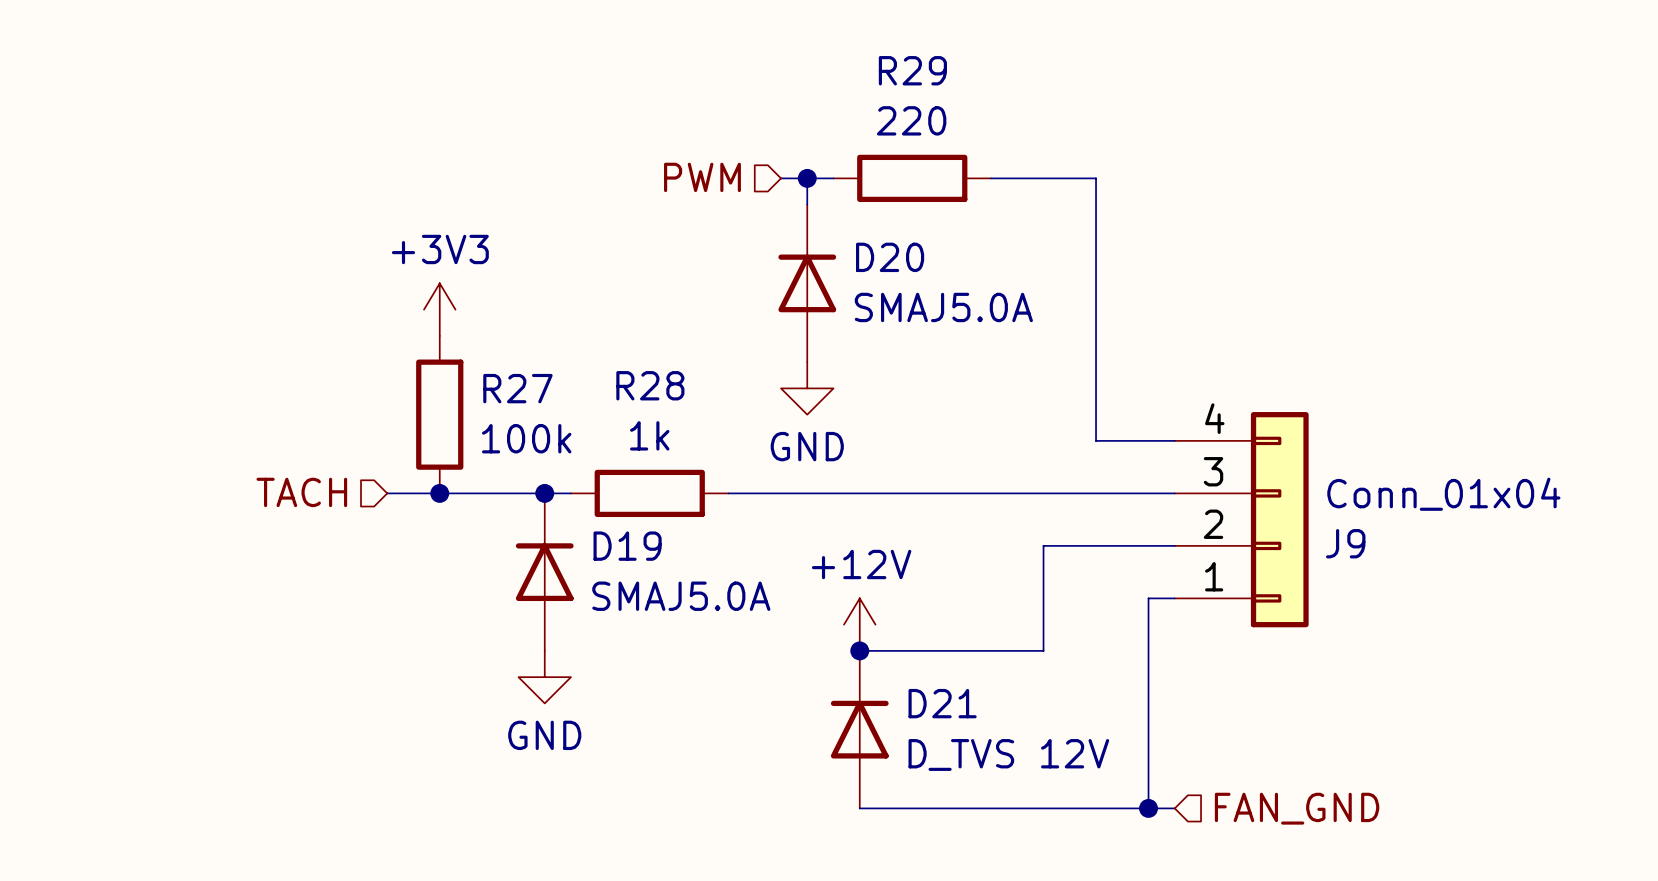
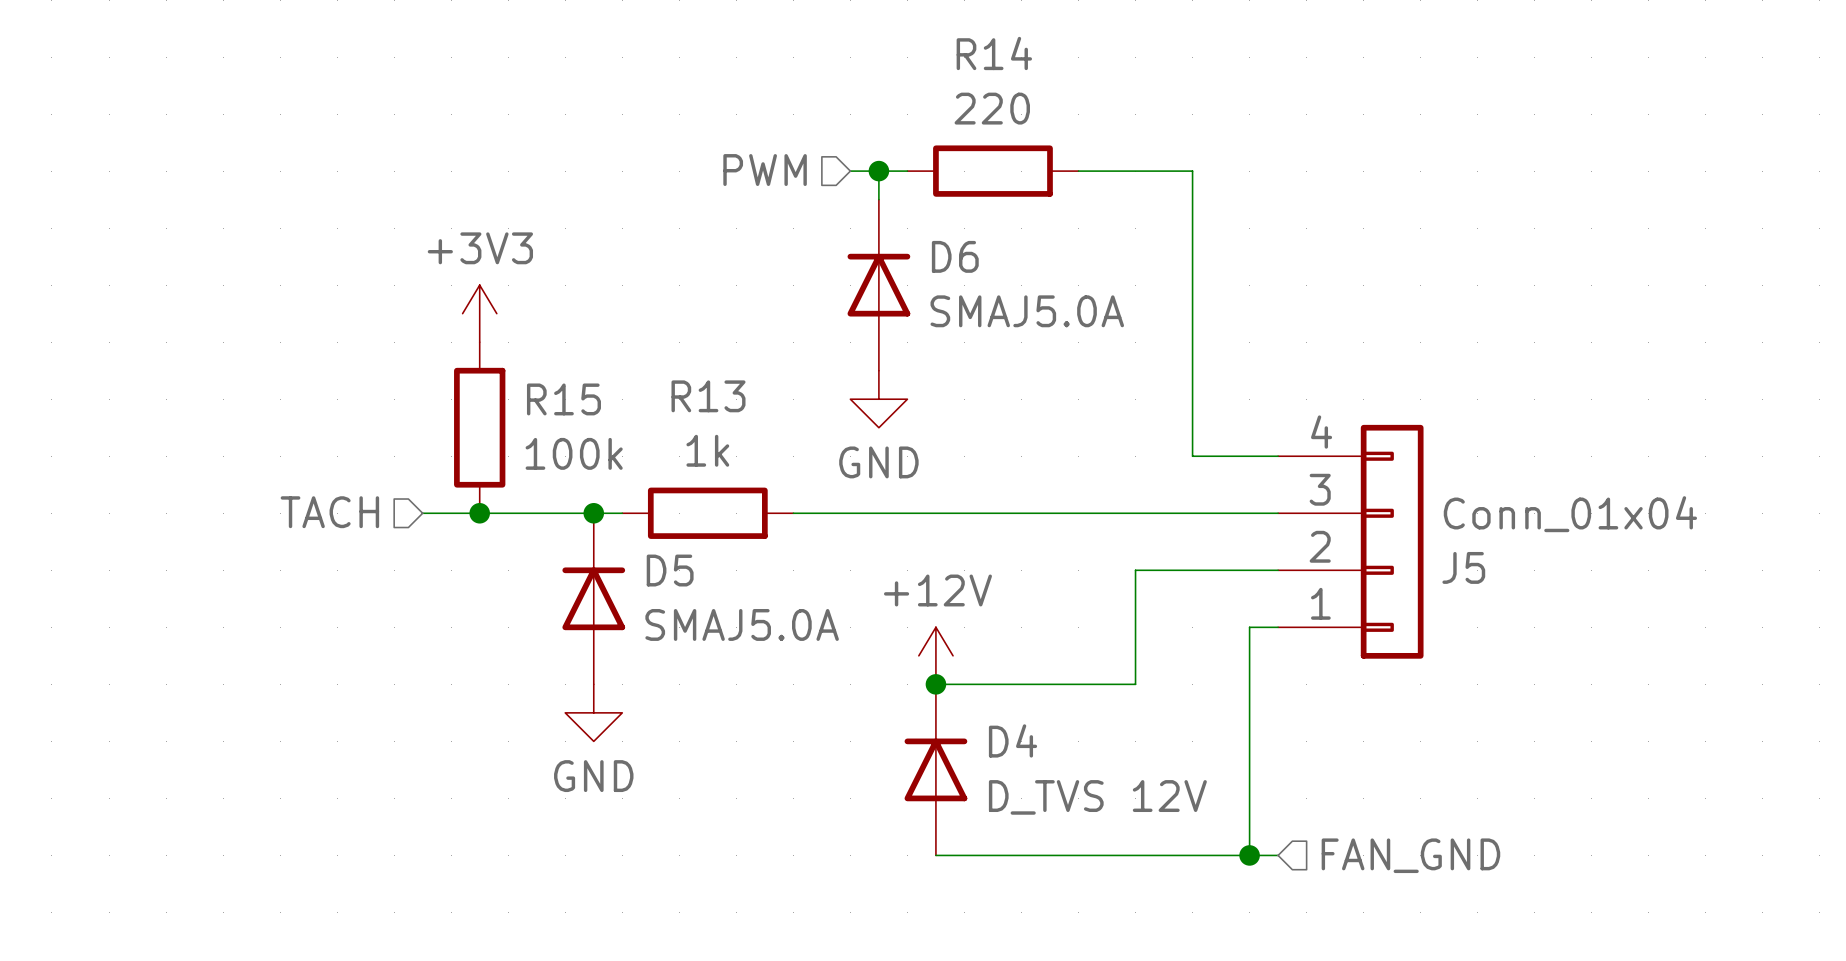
R29 name: R29 (912, 70) -> R14 (994, 53)
D20 name: D20 (890, 257) -> D6 (955, 256)
R28 name: R28 (650, 385) -> R13 (708, 396)
R27 name: R27 (517, 388) -> R15 (563, 399)
J9 name: J9 (1345, 543) -> J5 (1463, 567)
D19 name: D19 (627, 546) -> D5 (670, 570)
D21 name: D21 (942, 703) -> D4 (1013, 740)

